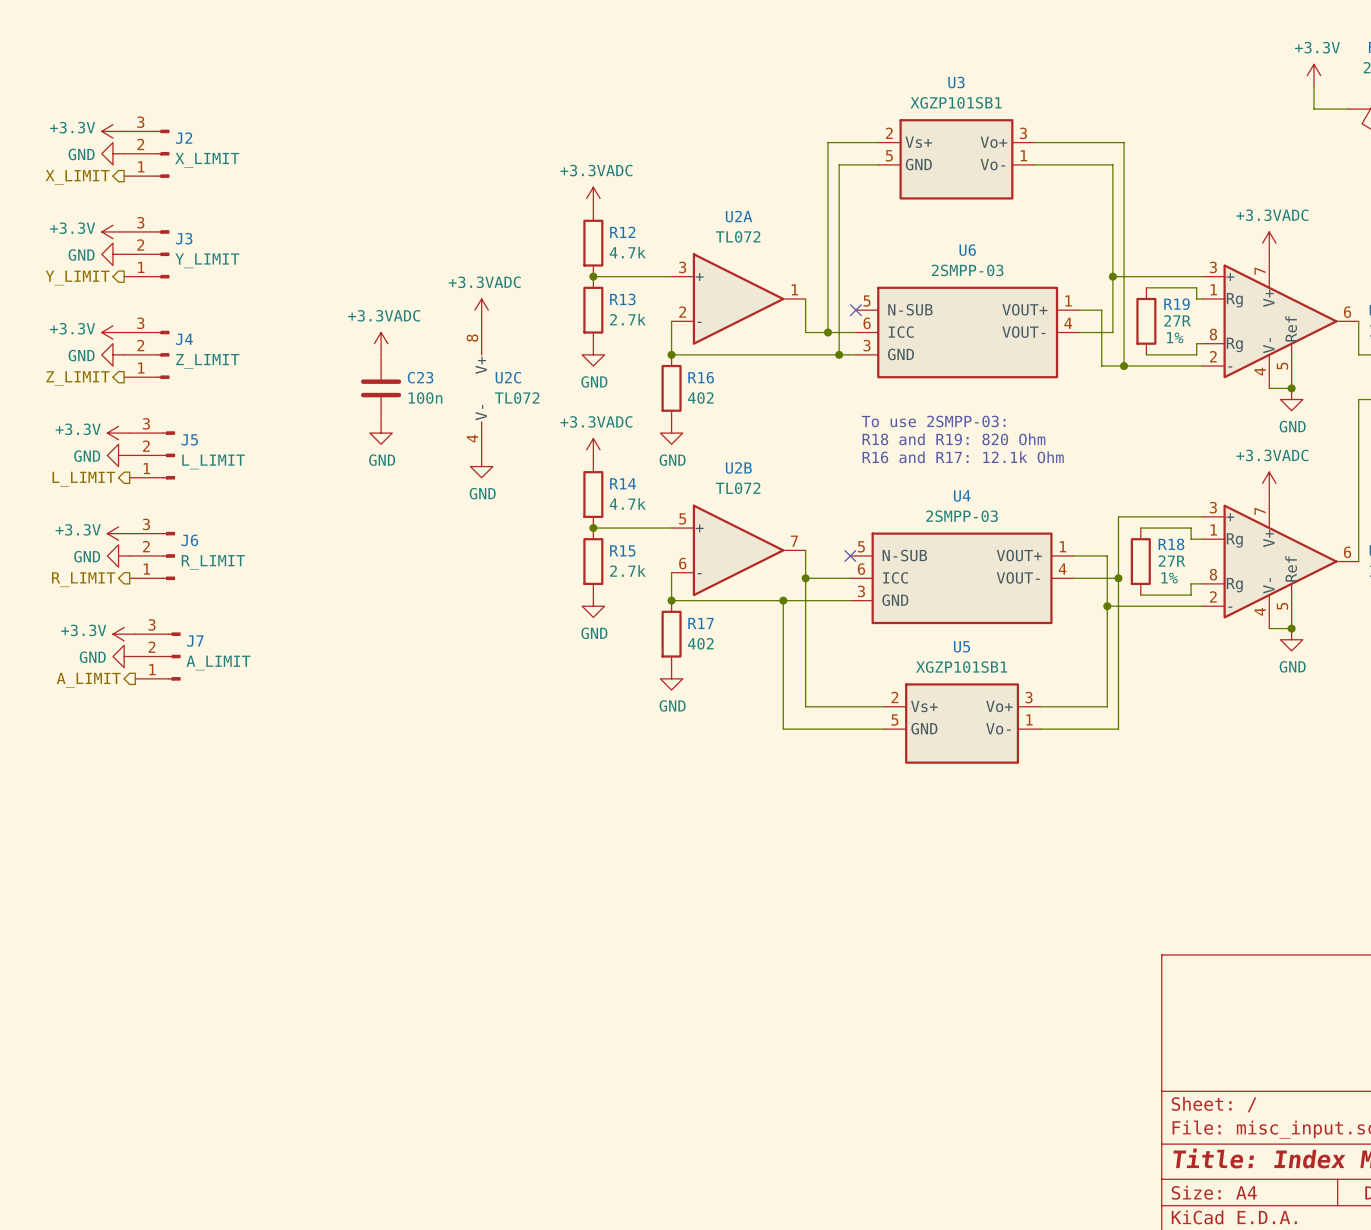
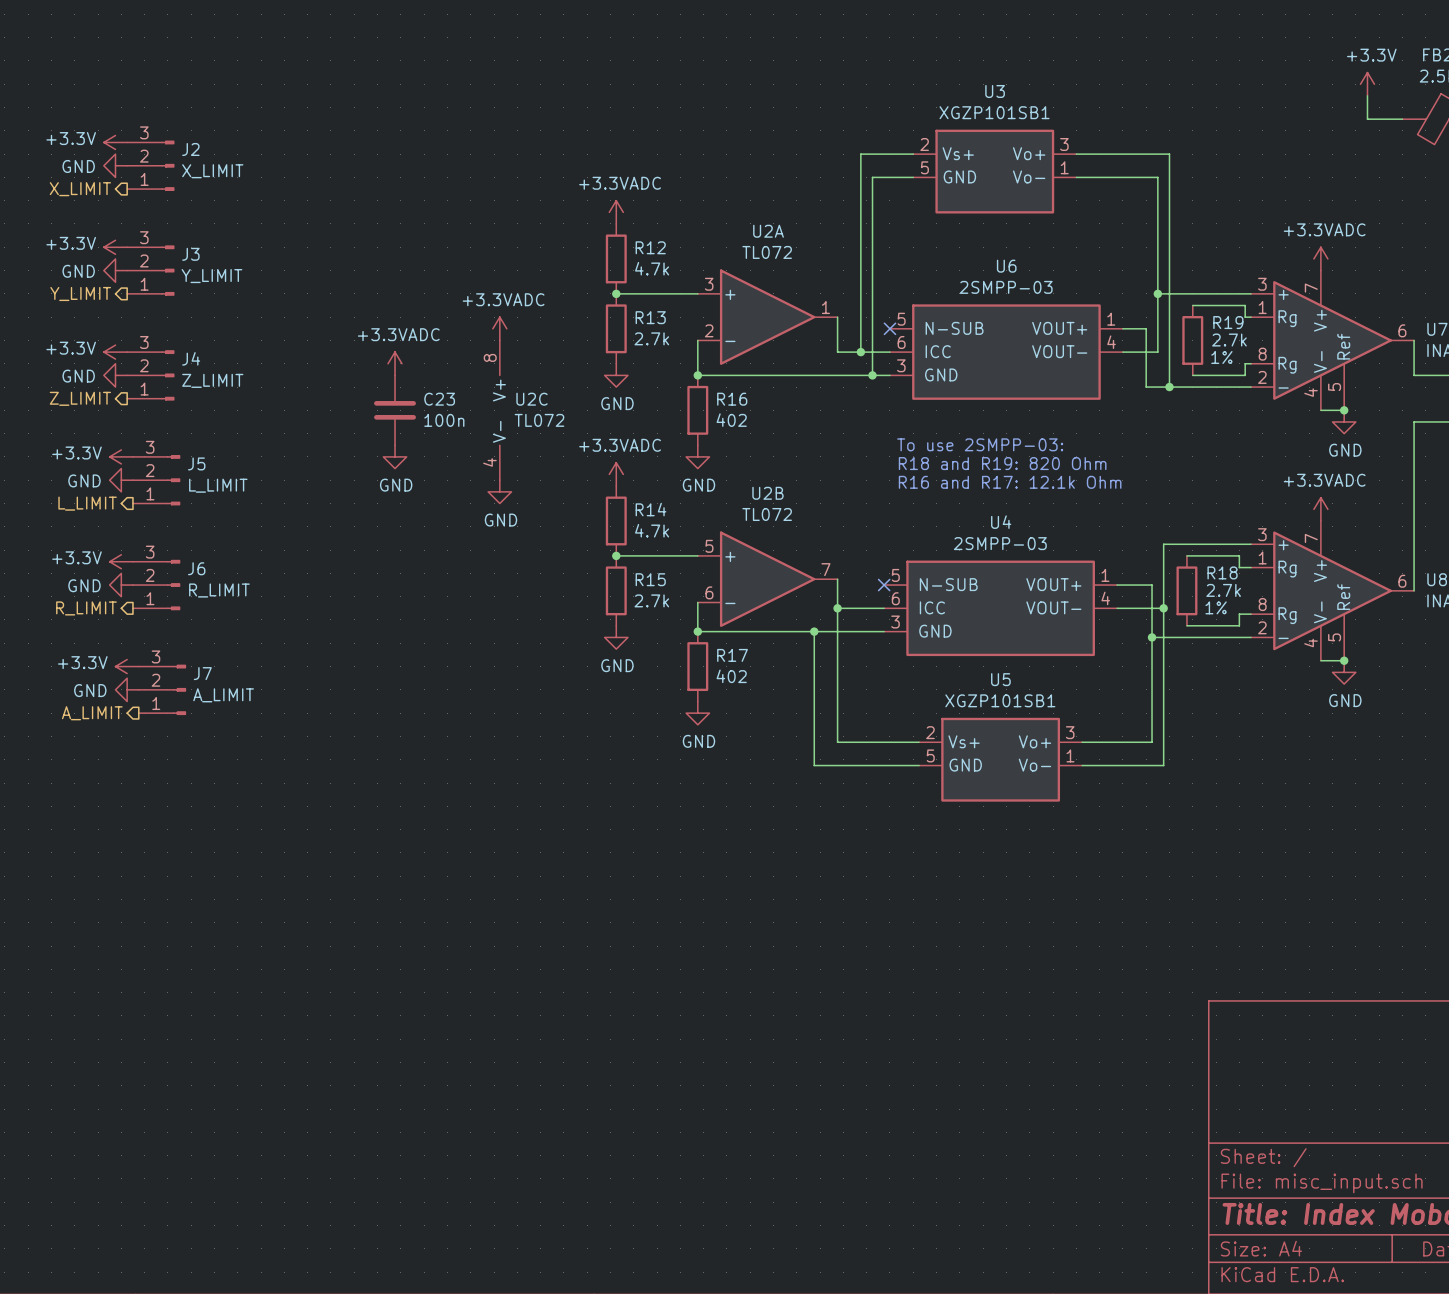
R19 value: 27R (1177, 320) -> 2.7k (1229, 340)
R18 value: 27R (1171, 561) -> 2.7k (1223, 590)

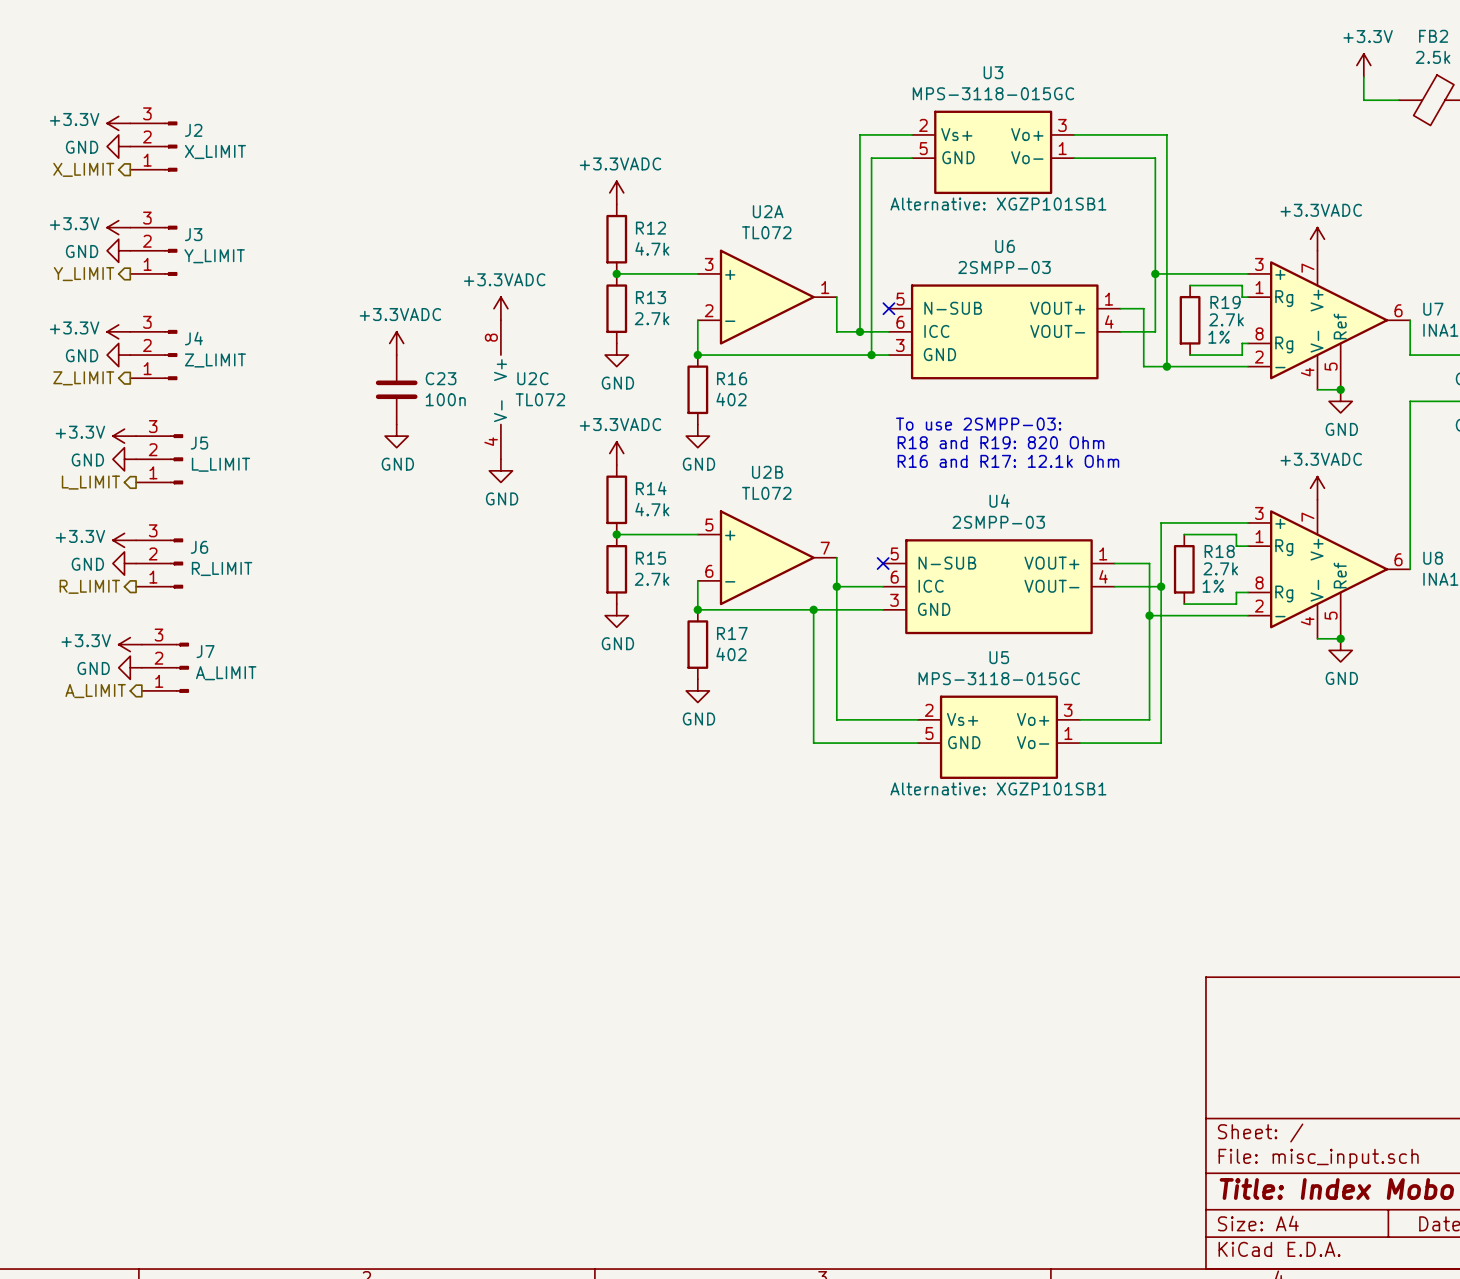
U3 value: XGZP101SB1 (994, 112) -> MPS-3118-015GC (993, 93)
U3 text: none -> Alternative: XGZP101SB1 (998, 204)
U5 value: XGZP101SB1 (1000, 700) -> MPS-3118-015GC (999, 678)
U5 text: none -> Alternative: XGZP101SB1 (998, 788)

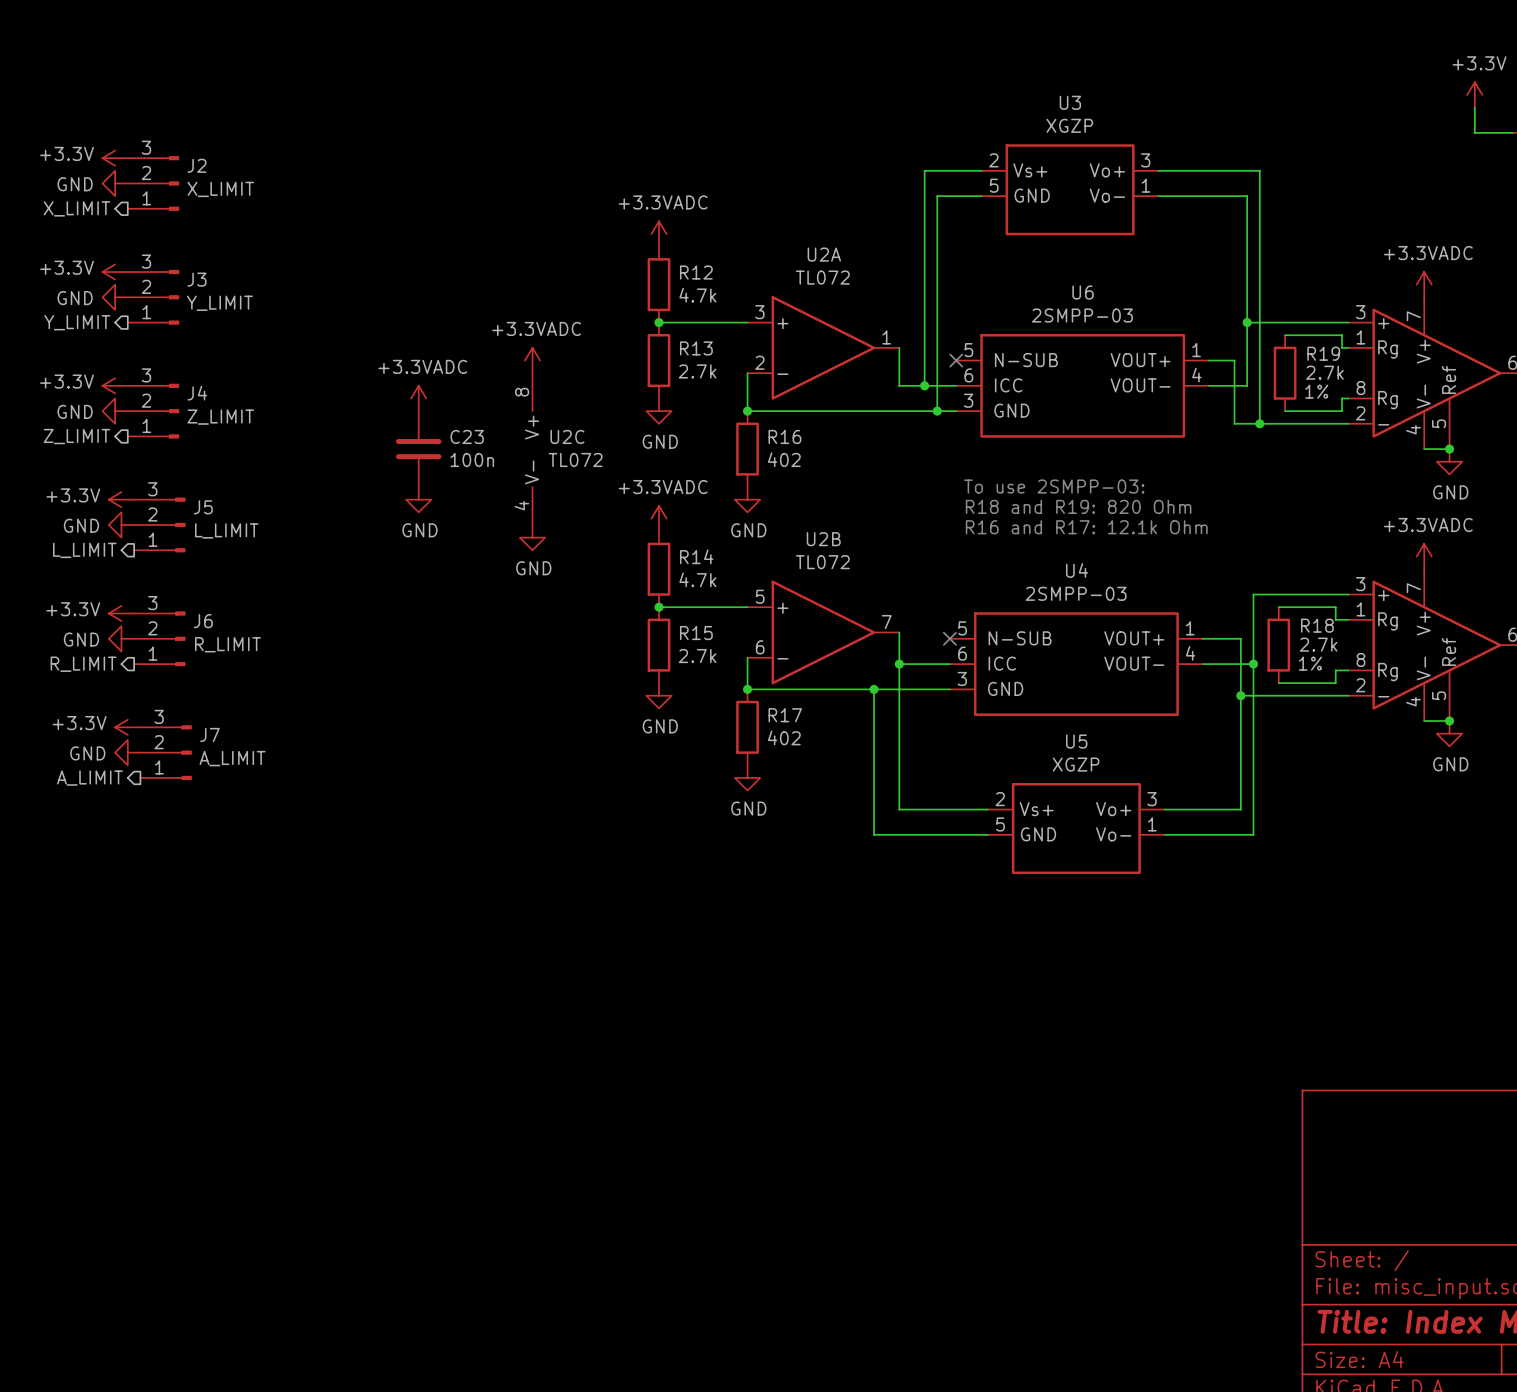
U3 value: MPS-3118-015GC (993, 93) -> XGZP (1069, 125)
U3 text: Alternative: XGZP101SB1 (998, 204) -> none
U5 value: MPS-3118-015GC (999, 678) -> XGZP (1076, 764)
U5 text: Alternative: XGZP101SB1 (998, 788) -> none

